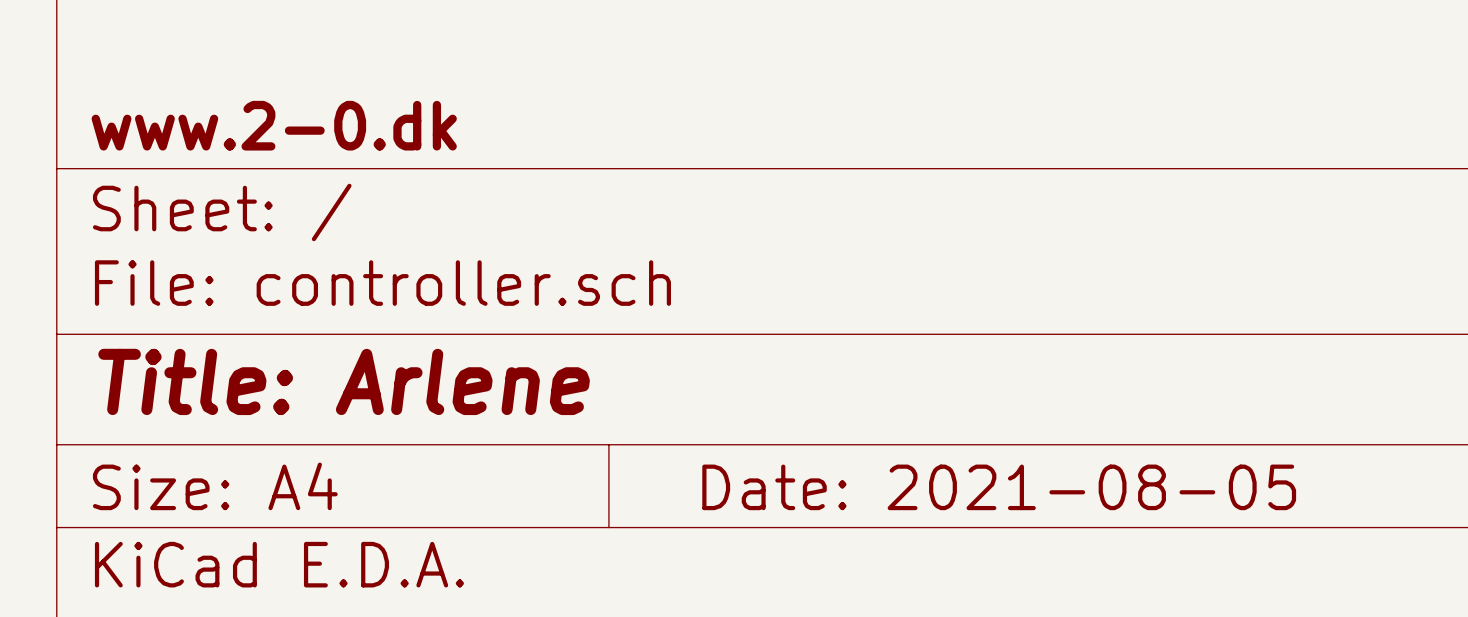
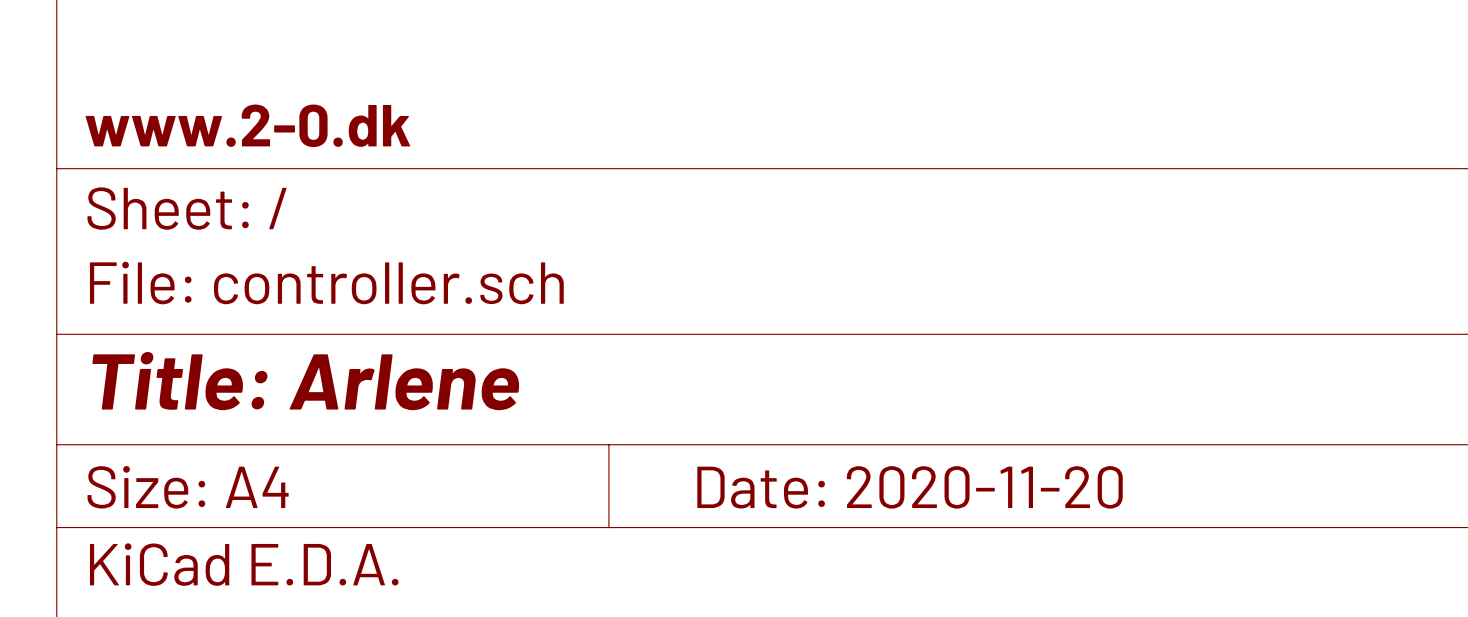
title block: Date: 2021-08-05 (999, 487) -> Date: 2020-11-20 (910, 487)

